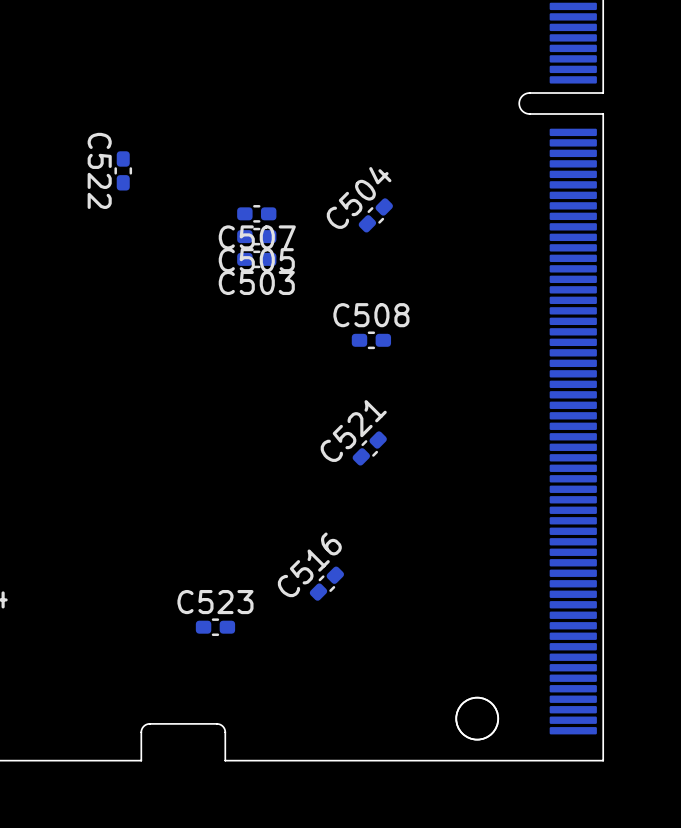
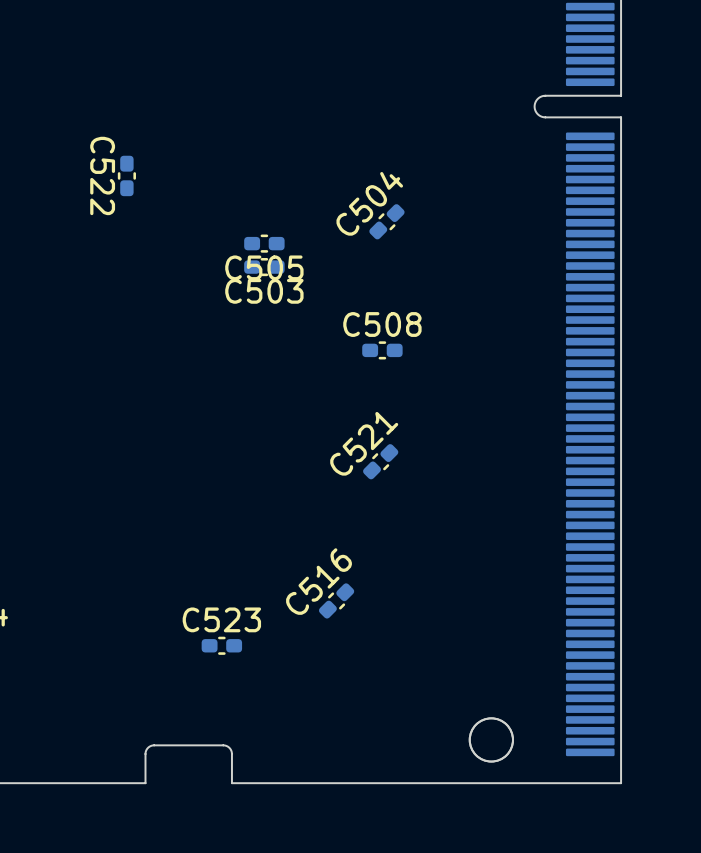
C507: (256, 213) -> none

